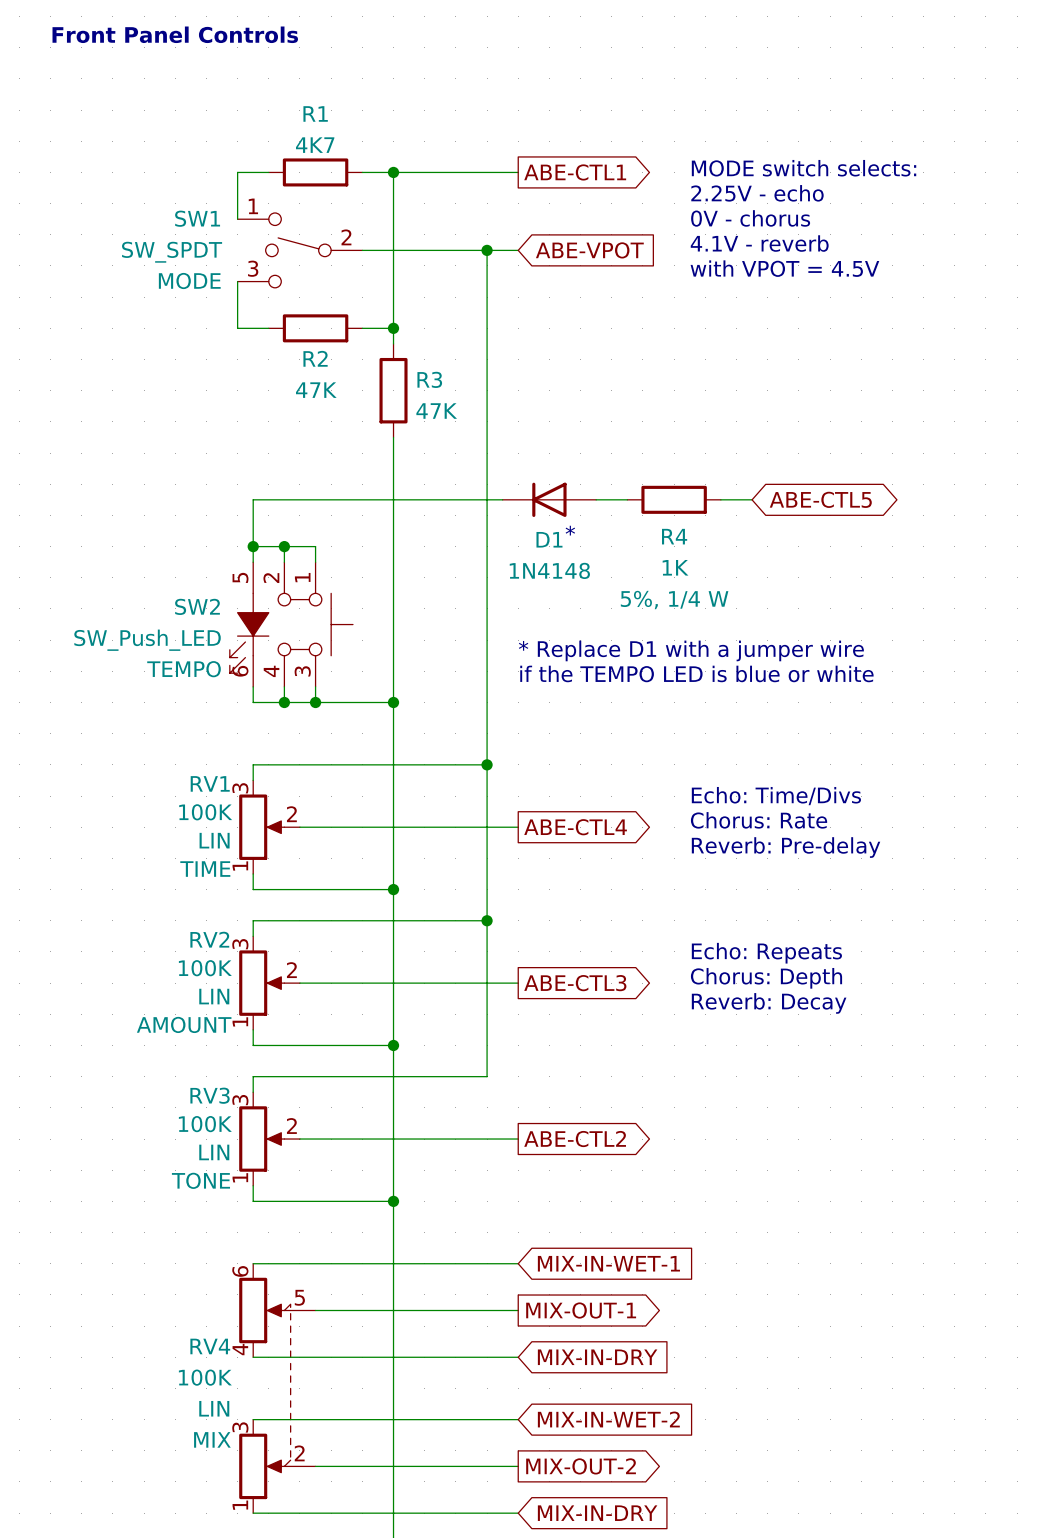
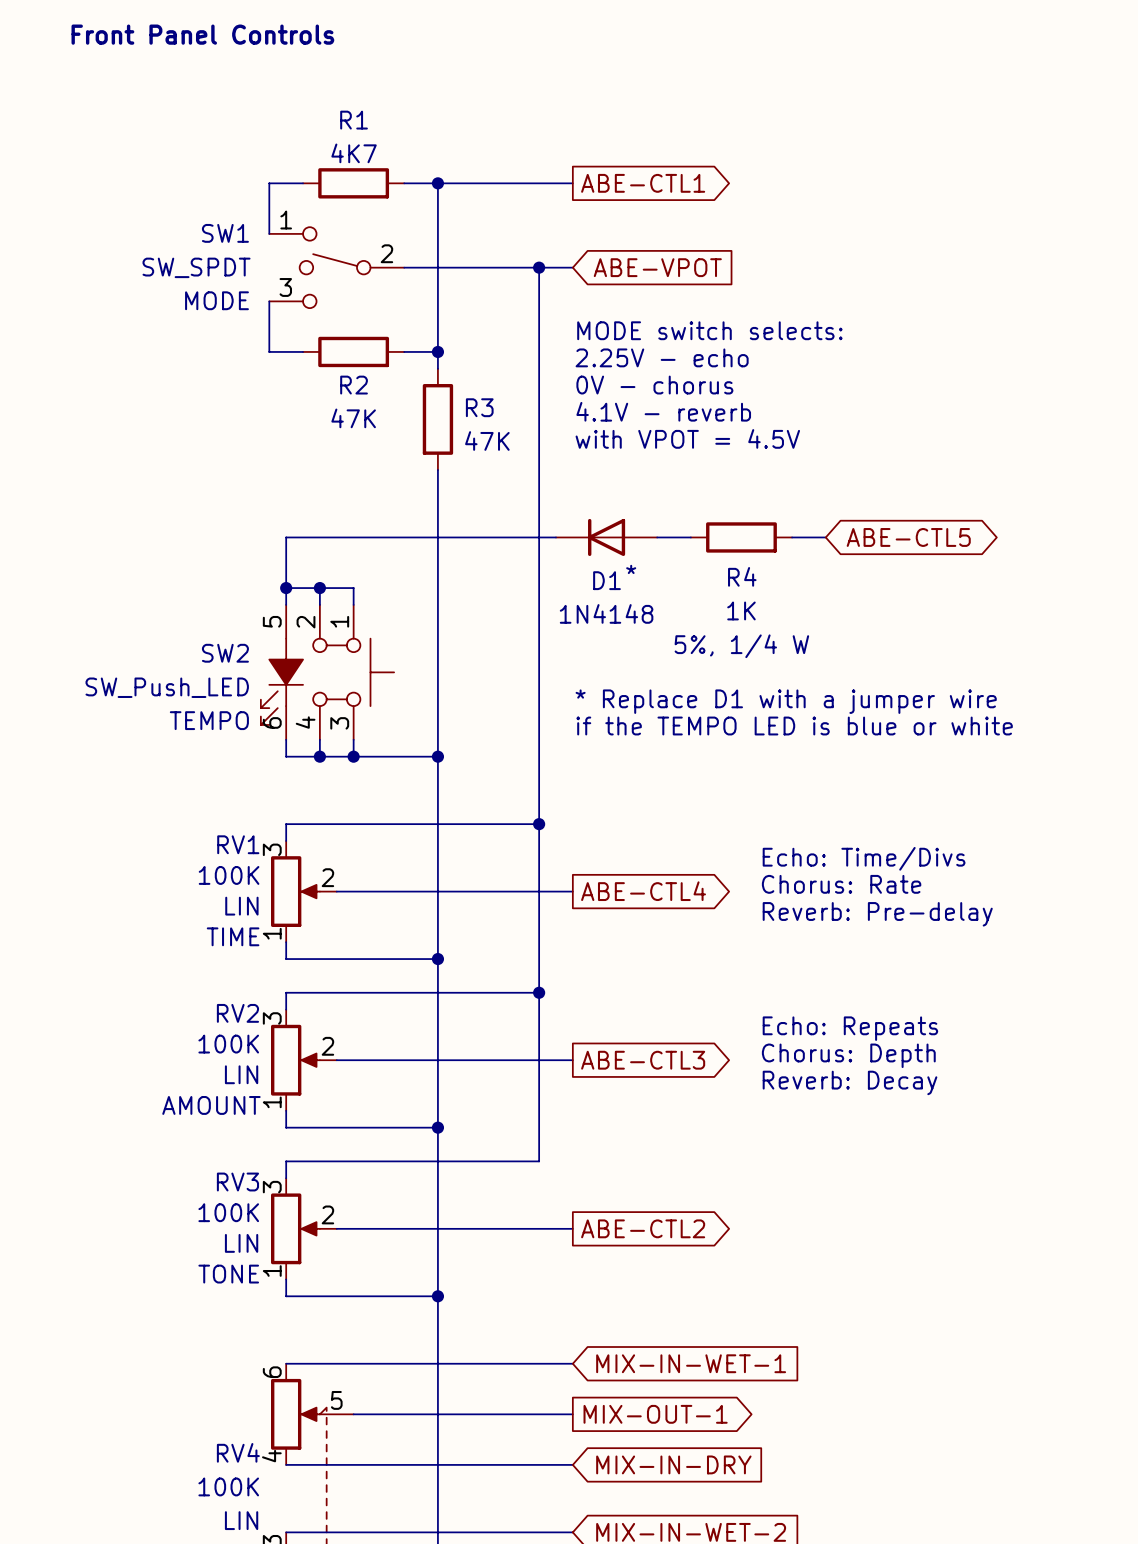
text position: MODE switch selects: (804, 168) -> MODE switch selects: (709, 330)
text position: 2.25V - echo (757, 193) -> 2.25V - echo (662, 357)
text position: 0V - chorus (750, 218) -> 0V - chorus (654, 385)
text position: 4.1V - reverb (759, 243) -> 4.1V - reverb (663, 411)
text position: with VPOT = 4.5V (784, 268) -> with VPOT = 4.5V (687, 438)

